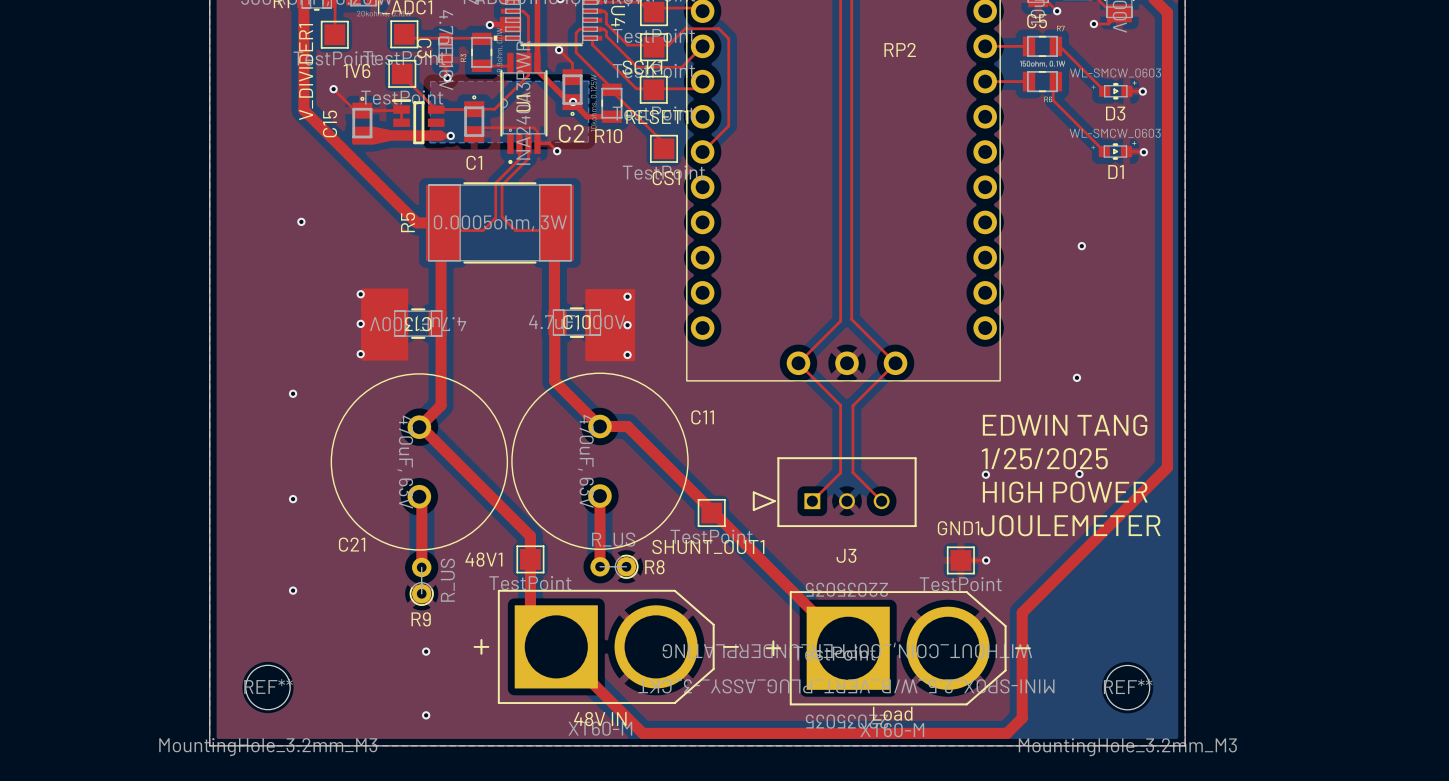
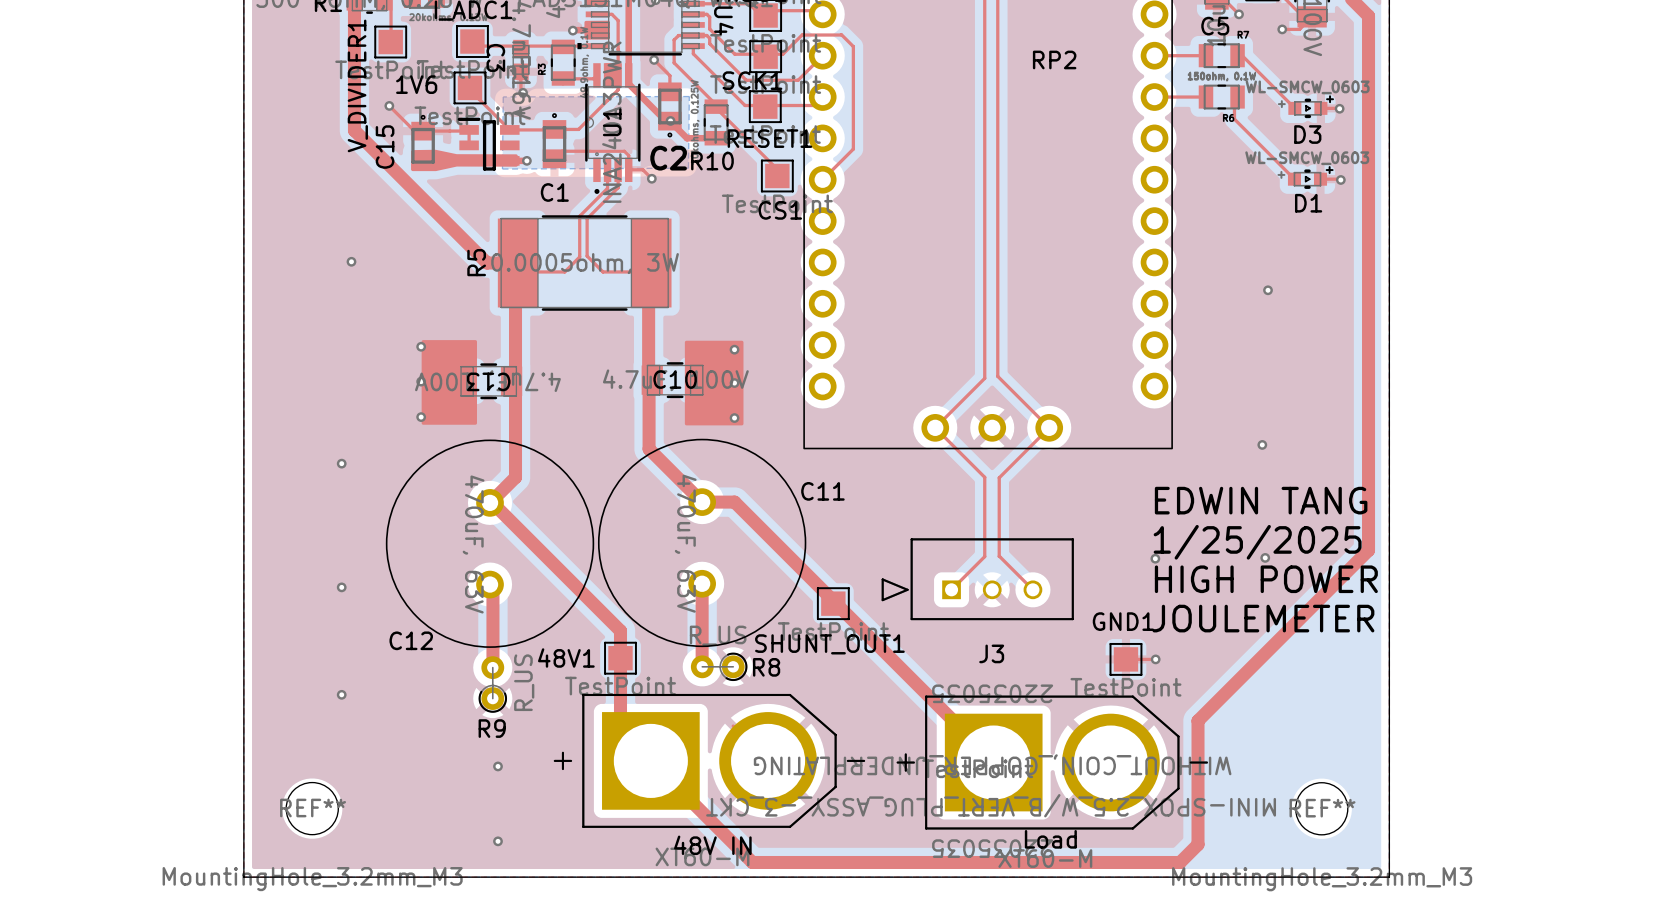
C21 name: C21 (352, 544) -> C12 (411, 640)

